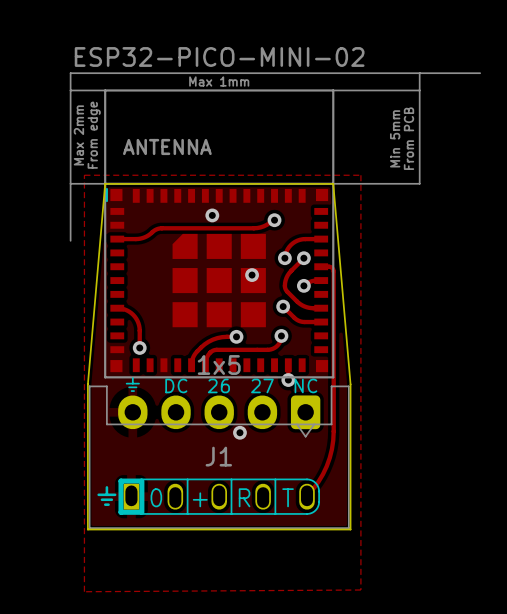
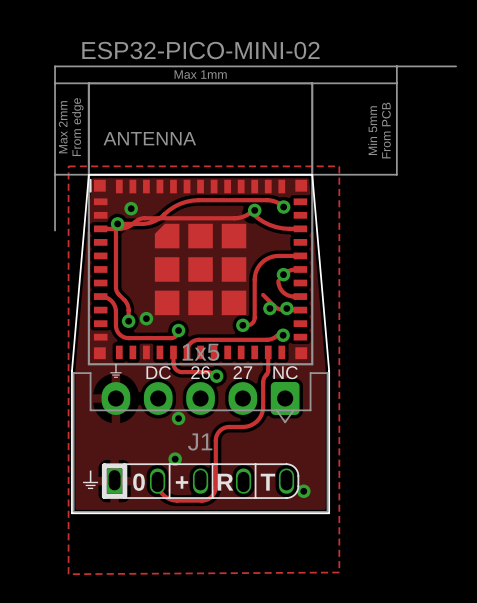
via: (212, 215) -> none
track: none -> (283, 207) (269, 200) (192, 200) (174, 206) (150, 222) (116, 224) (115, 288) (127, 304) (128, 321)
via: none -> (283, 207)
via: none -> (131, 208)
via: none -> (117, 223)
track: (310, 239) (300, 239) (292, 243) (286, 251) (284, 259) -> (289, 228) (269, 224) (252, 213)
via: (284, 258) -> none
track: (302, 258) (287, 275) (285, 288) (300, 304) (314, 308) -> (278, 281) (282, 292) (293, 296)
via: (303, 258) -> none
track: (321, 266) (330, 266) (333, 270) (333, 440) (326, 466) (318, 482) (307, 495) -> (300, 255) (272, 256) (259, 265) (254, 276) (254, 319) (250, 324) (242, 325)
via: (252, 275) -> none
via position: (283, 306) -> (269, 308)
track: (117, 308) (127, 310) (136, 318) (139, 328) (139, 347) -> (100, 296) (108, 298) (113, 304) (116, 328) (123, 337) (171, 338) (176, 335) (178, 330)
via: none -> (286, 308)
via: none -> (146, 318)
via: none -> (128, 321)
track: (281, 335) (278, 344) (271, 349) (213, 350) (207, 356) (205, 365) -> none
via: (281, 335) -> none
track: (236, 336) (222, 337) (208, 341) (194, 354) (191, 365) -> (216, 376) (208, 372) (177, 370) (173, 365) (173, 352)
via: (236, 336) -> none
via: none -> (242, 325)
via: none -> (178, 330)
via: (139, 347) -> none
via: none -> (283, 335)
track: none -> (277, 335) (268, 339) (196, 340) (189, 344) (187, 351)
track: none -> (268, 366) (267, 372) (263, 380) (263, 409) (258, 419) (248, 426) (224, 428) (216, 435) (215, 488) (211, 496) (203, 500) (172, 500) (161, 493) (157, 481)
via: (288, 380) -> none
via: none -> (216, 376)
via: none -> (178, 418)
via: (239, 432) -> none
via: none -> (175, 459)
via: none -> (303, 491)

